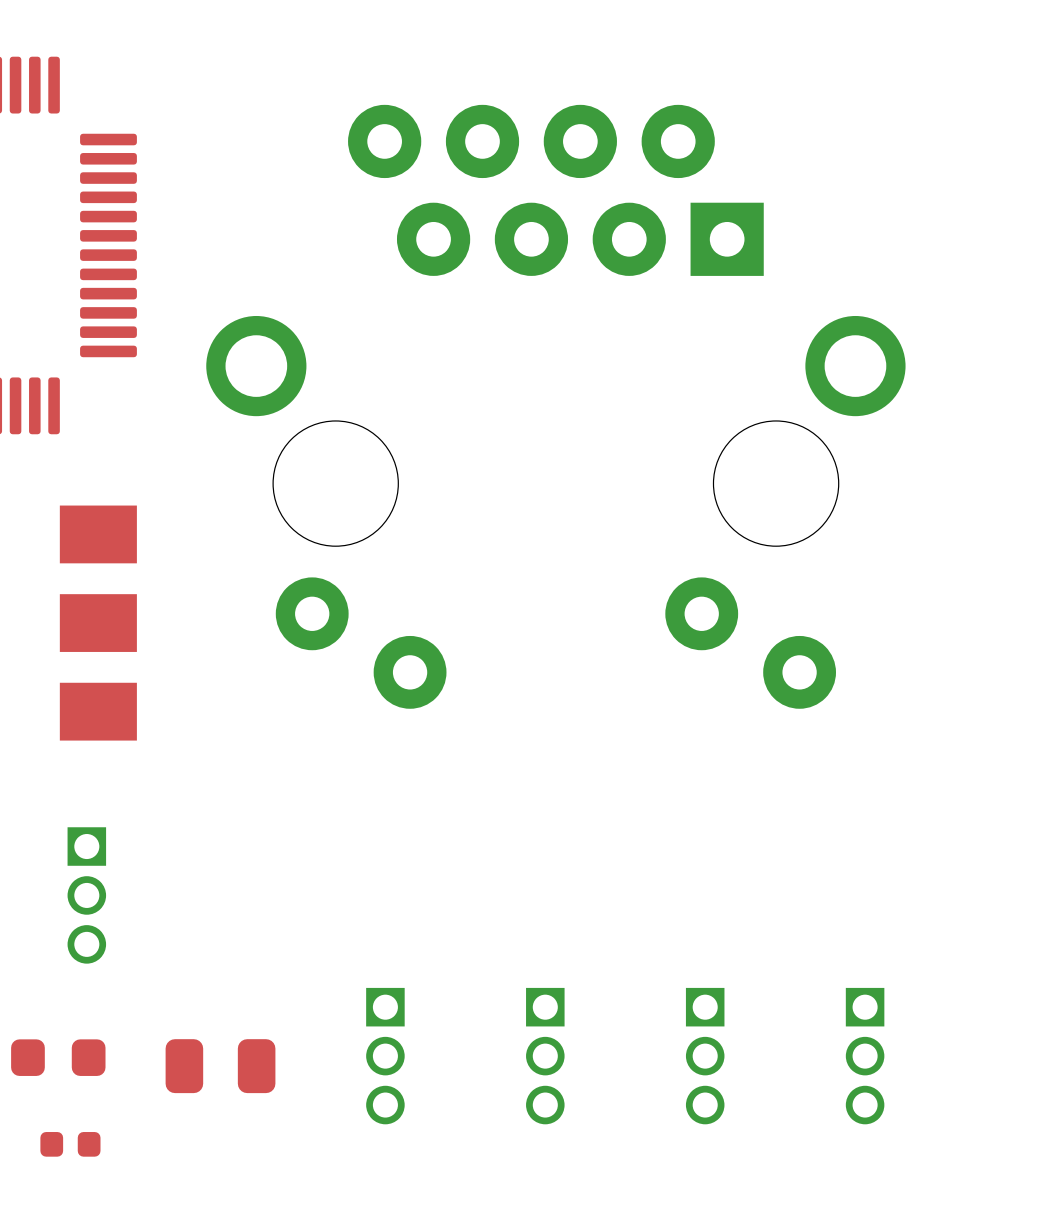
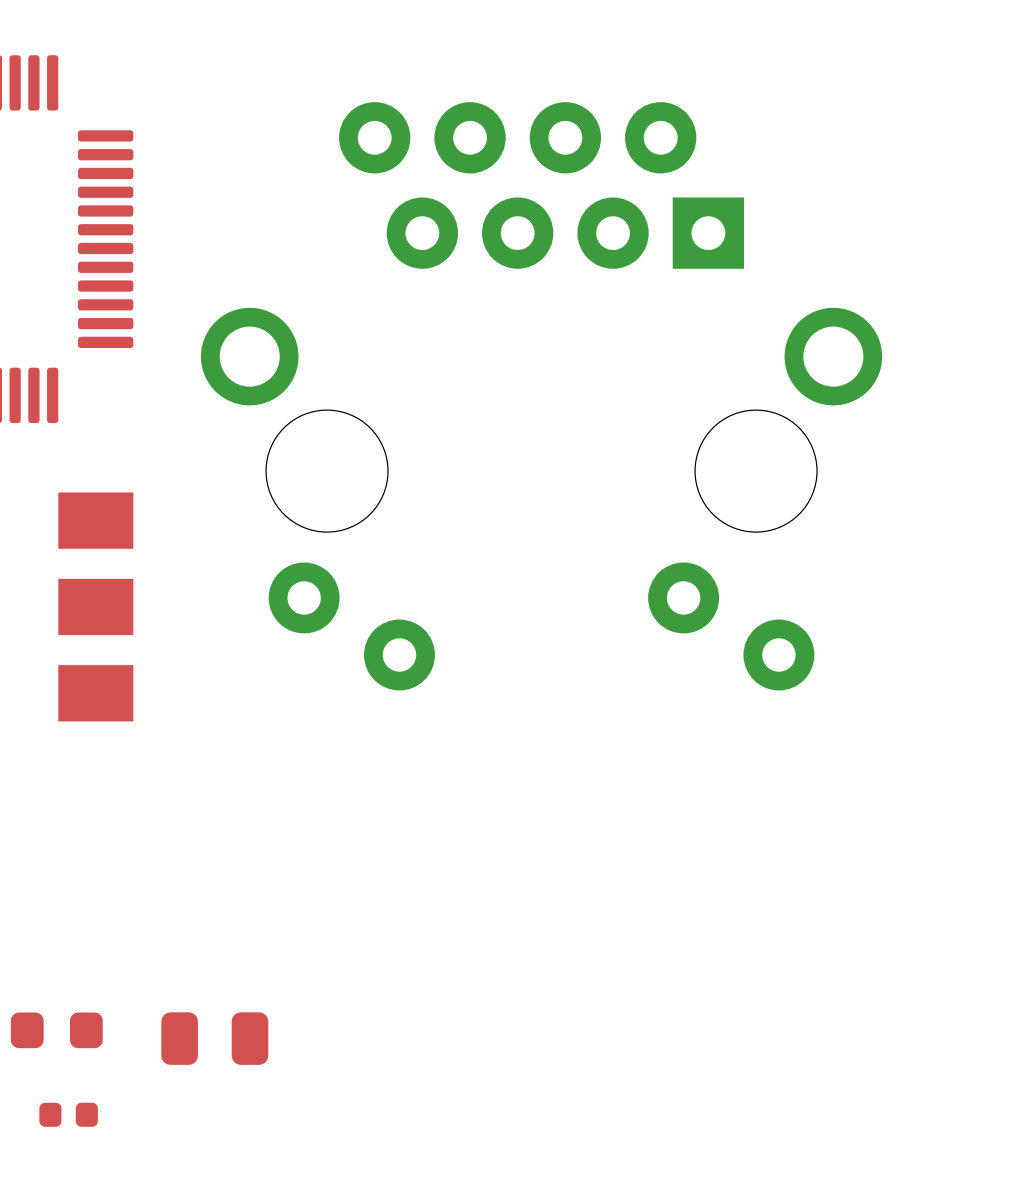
part: (86, 895) -> none
part: (385, 1056) -> none
part: (545, 1056) -> none
part: (705, 1056) -> none
part: (865, 1056) -> none

